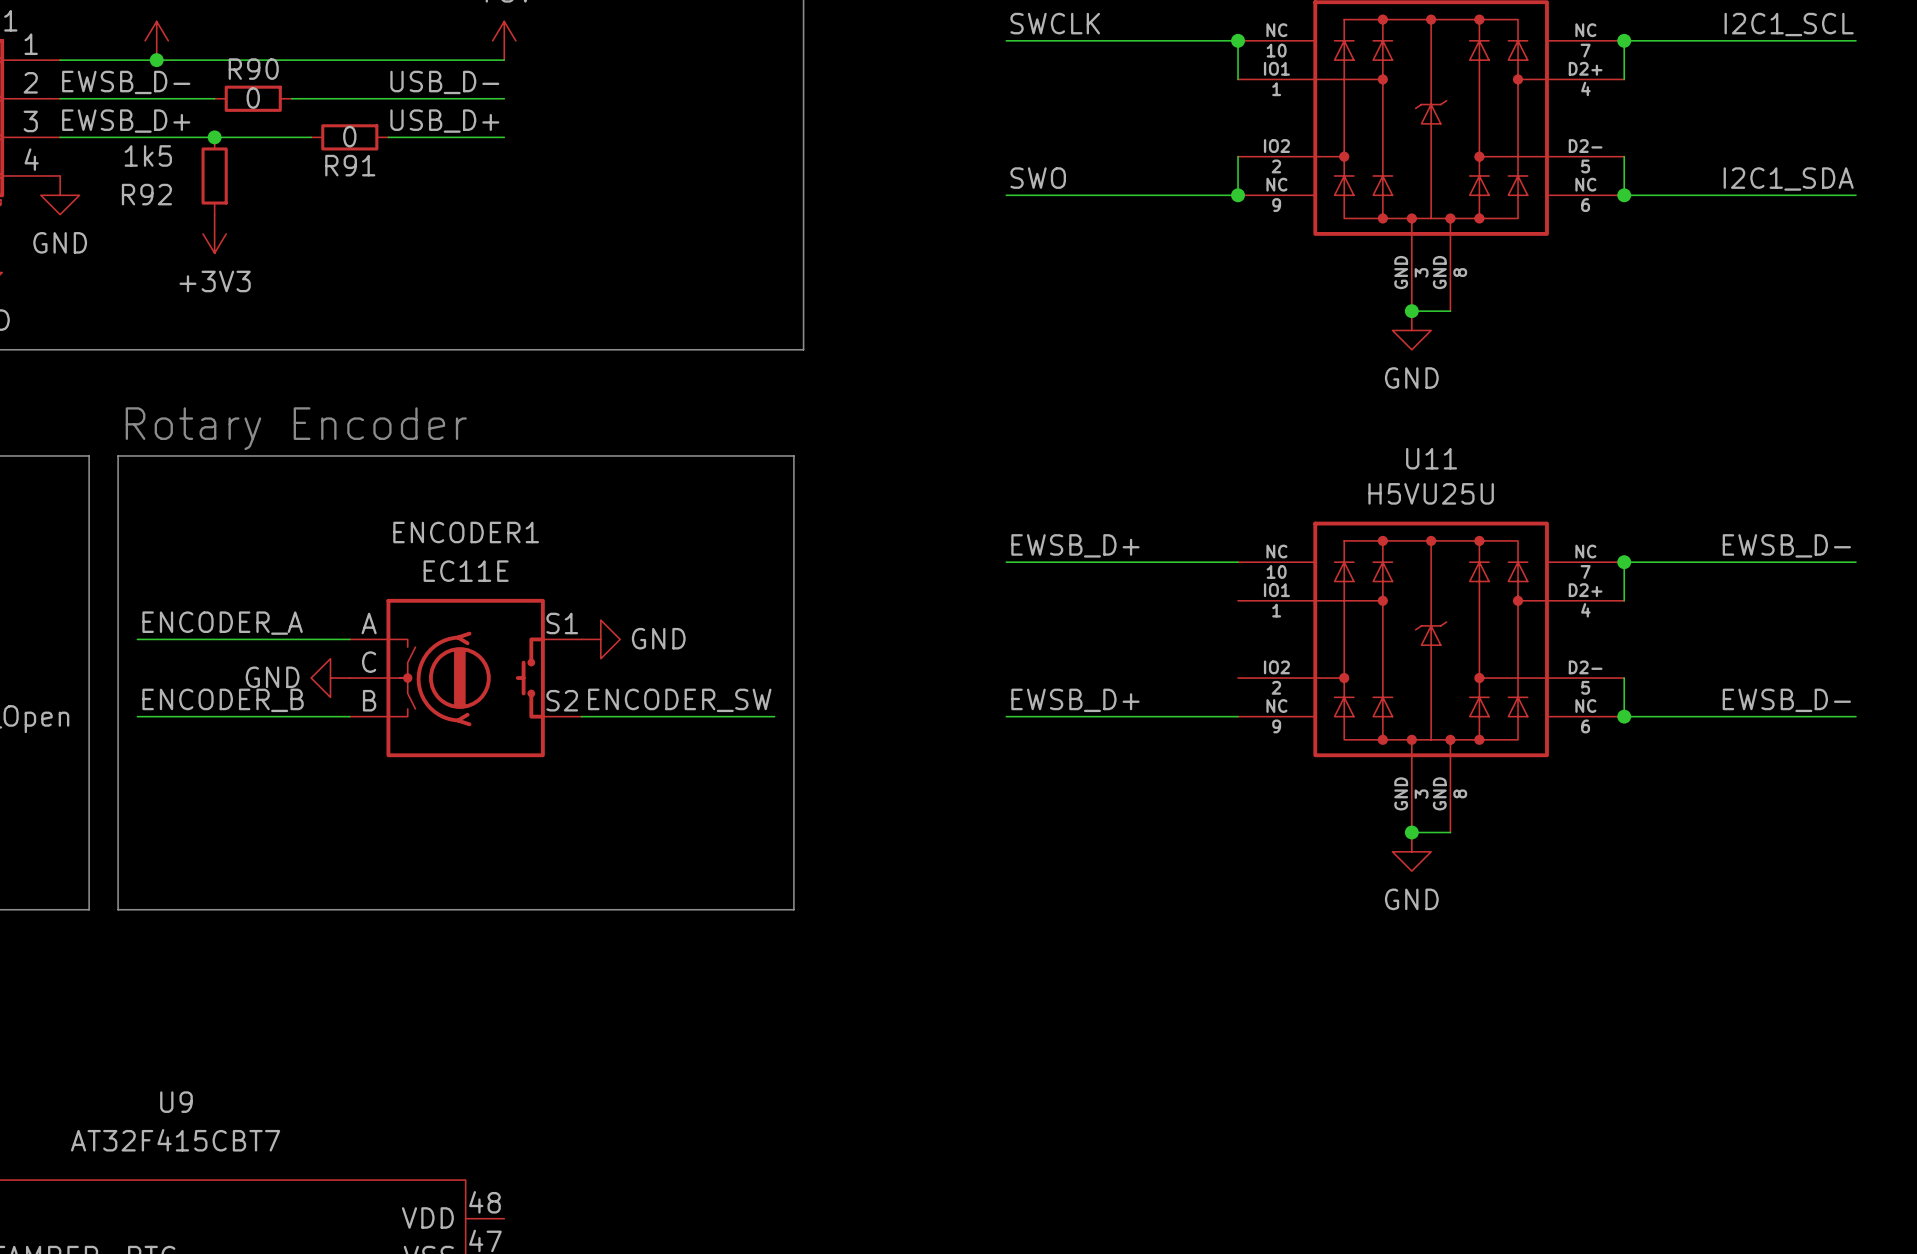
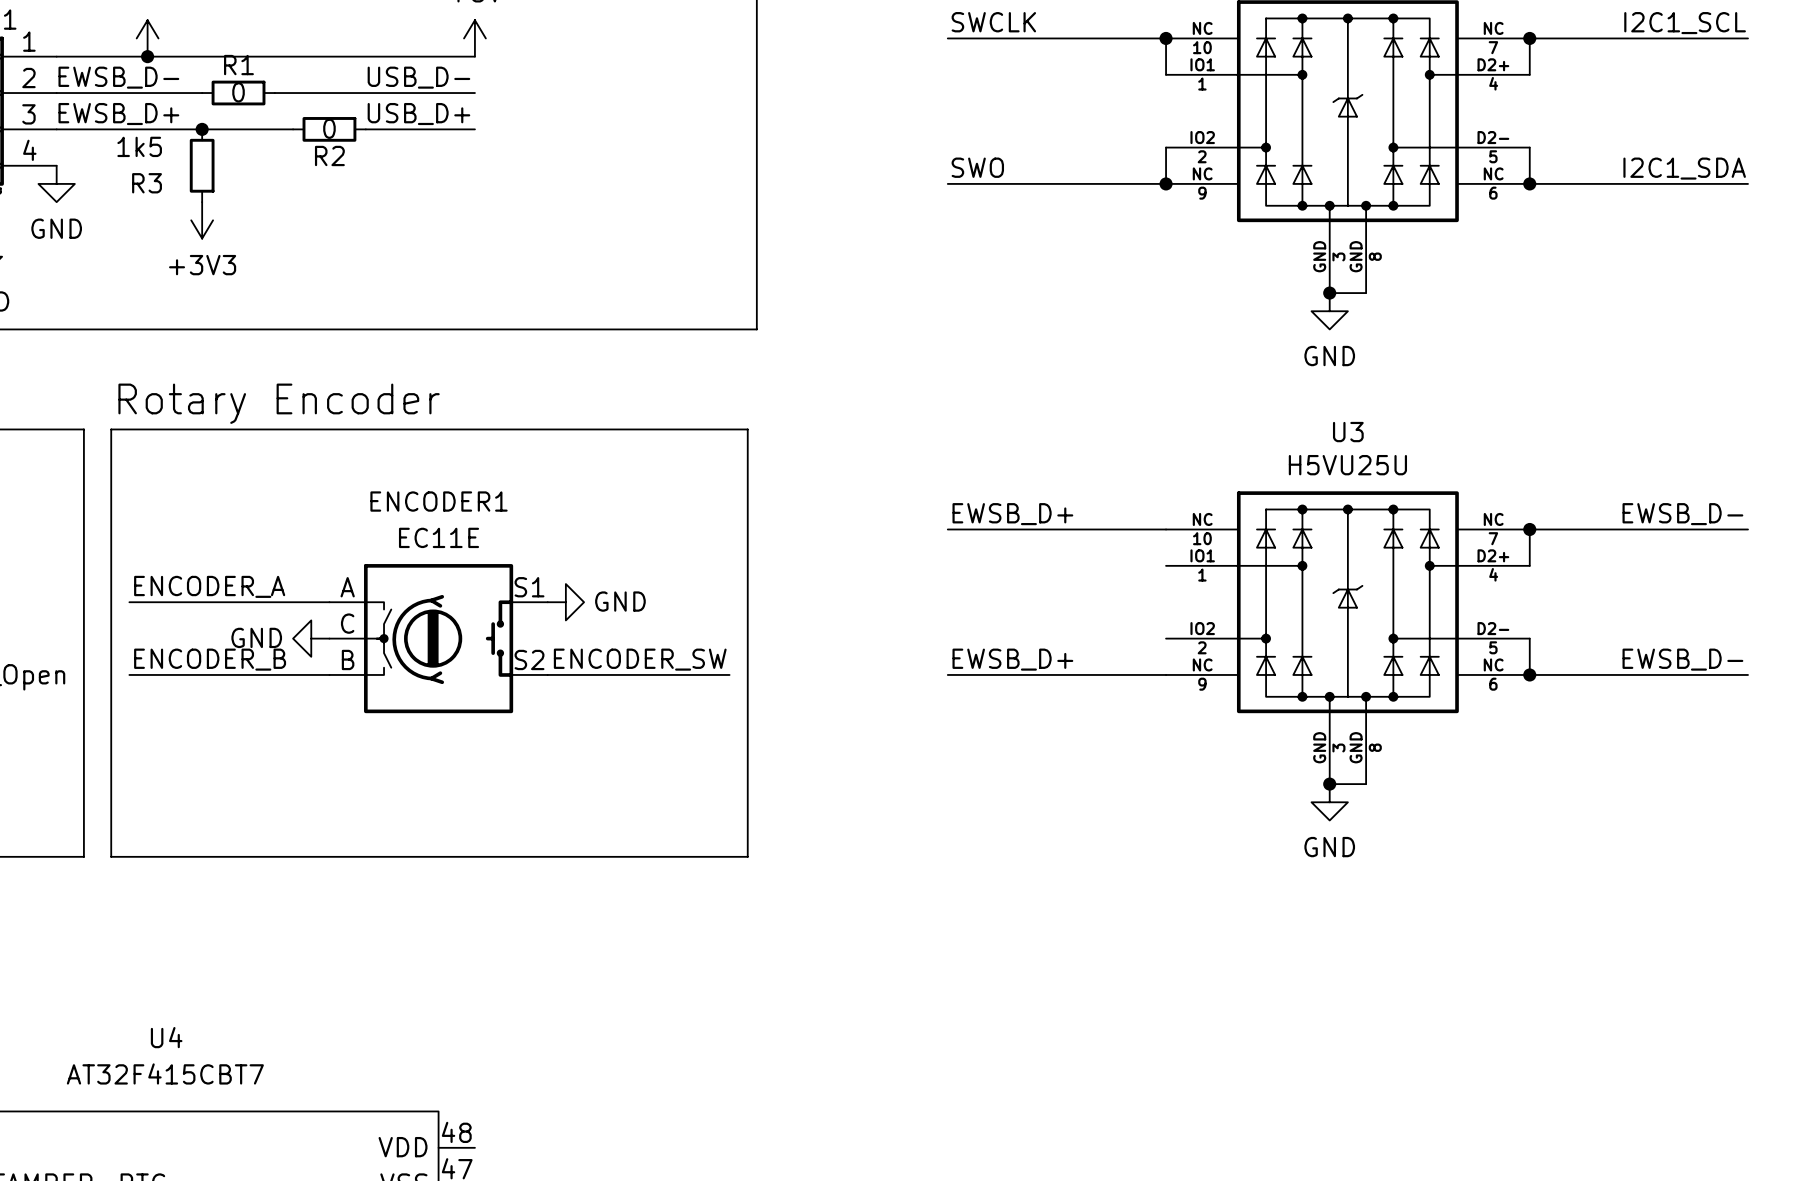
R90 name: R90 (253, 69) -> R1 (238, 65)
R91 name: R91 (350, 165) -> R2 (329, 155)
R92 name: R92 (146, 194) -> R3 (147, 183)
U11 name: U11 (1431, 458) -> U3 (1348, 432)
U9 name: U9 (176, 1102) -> U4 (166, 1037)

